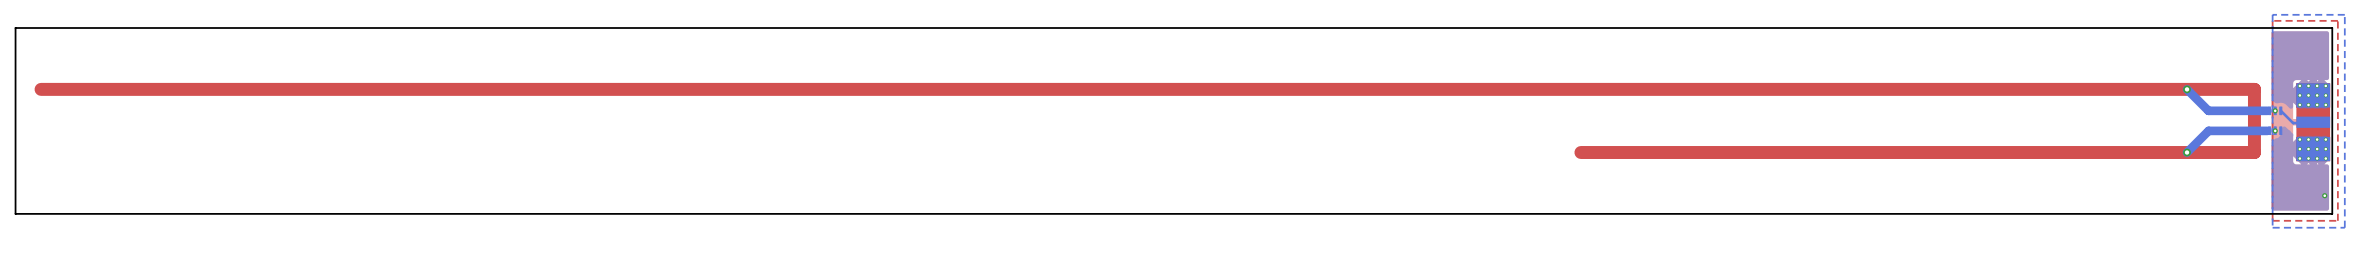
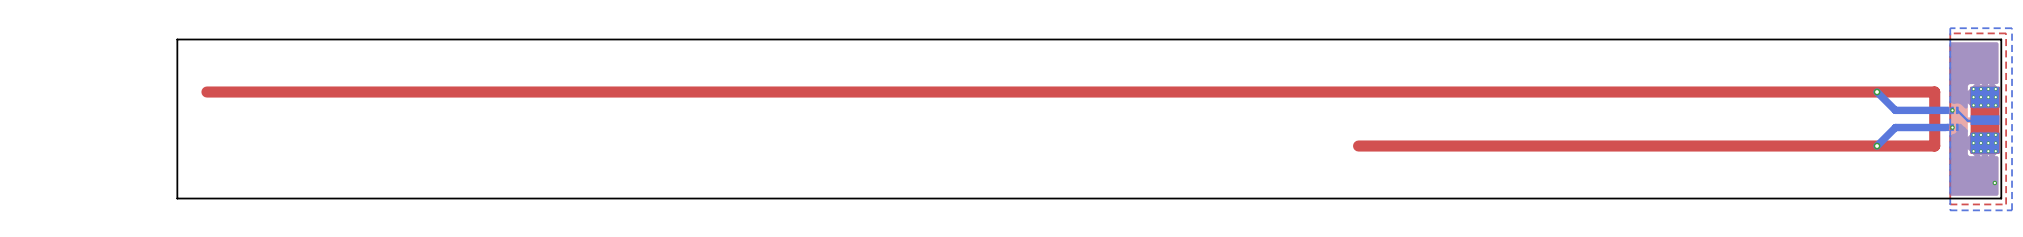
board edge: (200, 28) (15, 28) (15, 213) (200, 213) -> (177, 39) (177, 198)
top track: (234, 89) (41, 89) -> none

